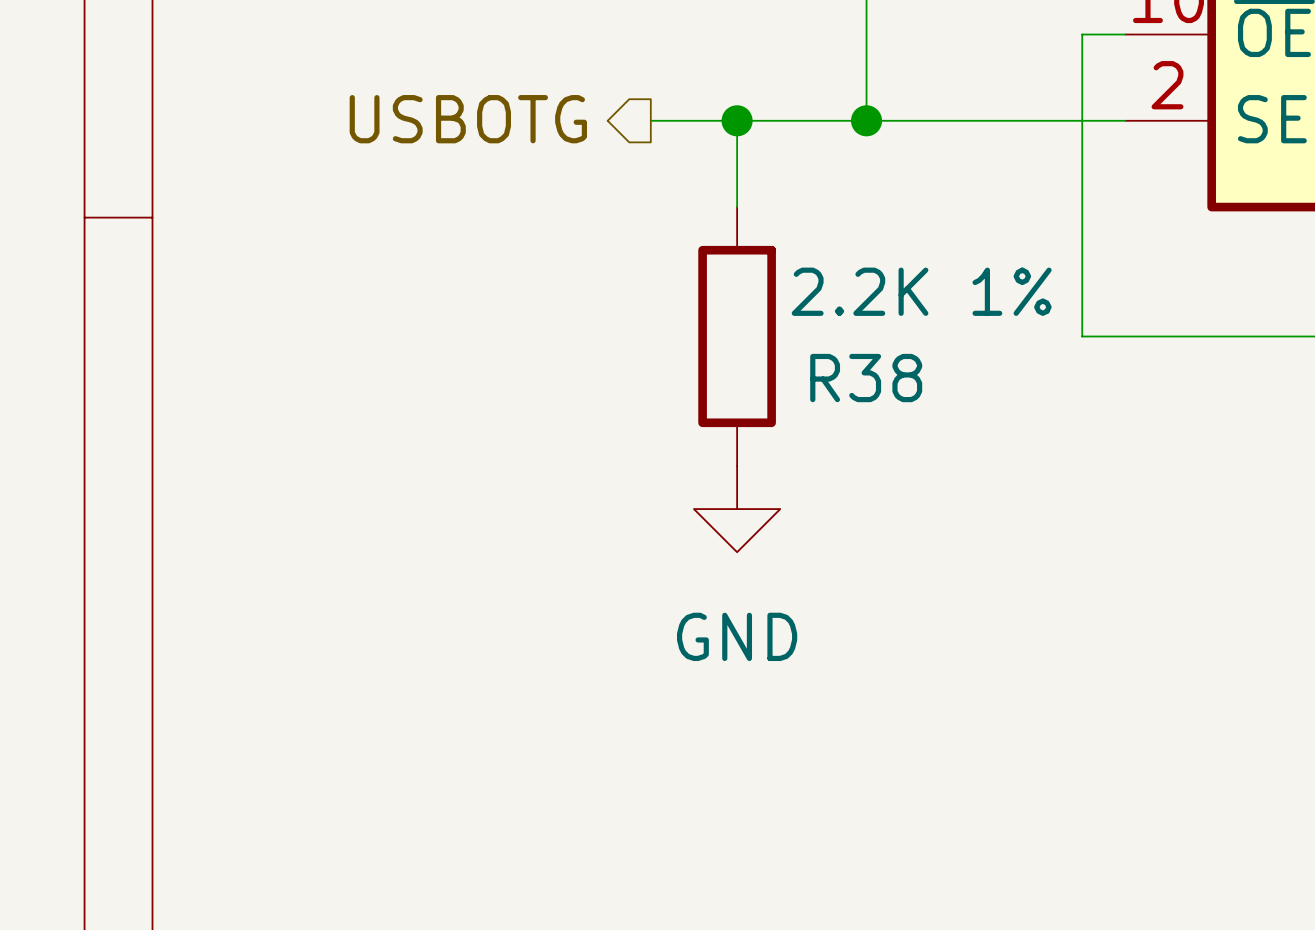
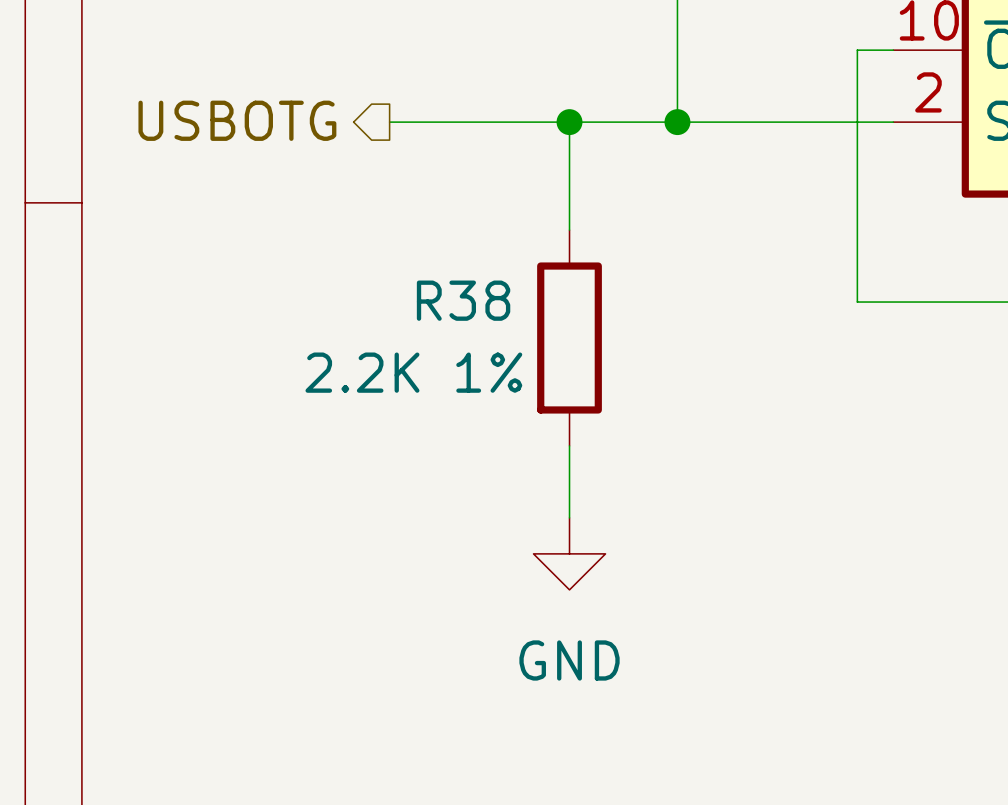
hierarchical label position: USBOTG (468, 119) -> USBOTG (237, 120)
wire: none -> (389, 122) (497, 122)
R38 value position: 2.2K 1% (921, 291) -> 2.2K 1% (413, 372)
R38 position: (737, 336) -> (569, 338)
R38 name position: R38 (866, 378) -> R38 (463, 300)
wire: none -> (569, 445) (569, 517)
power symbol position: GND (737, 509) -> GND (569, 553)

